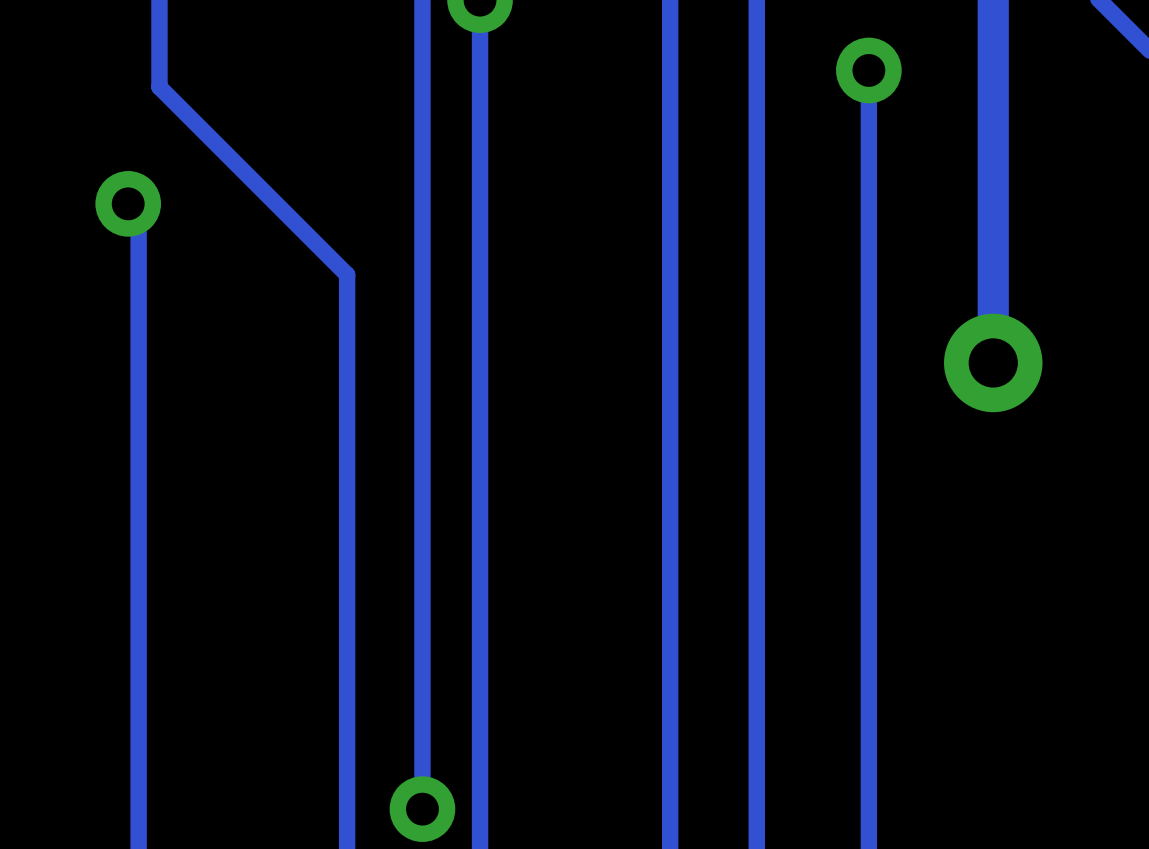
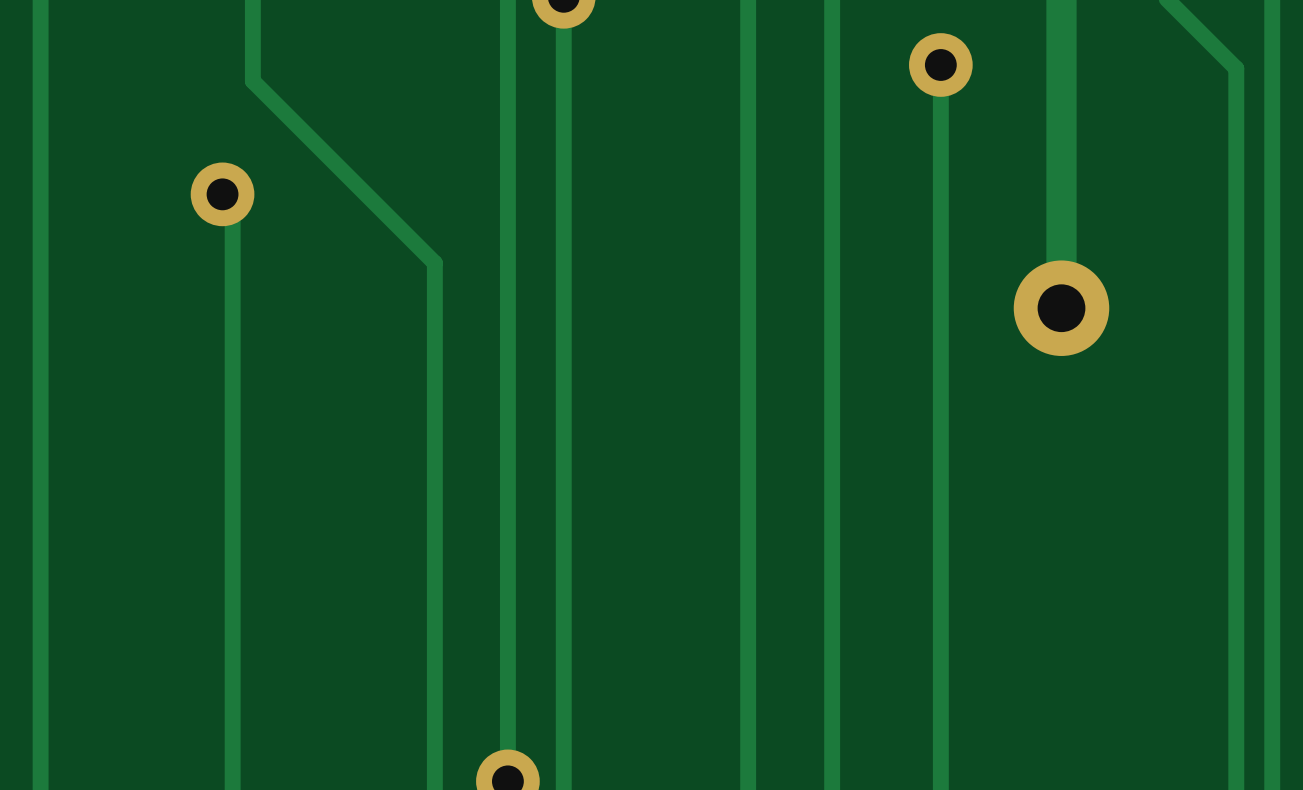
via position: (993, 362) -> (1061, 308)

